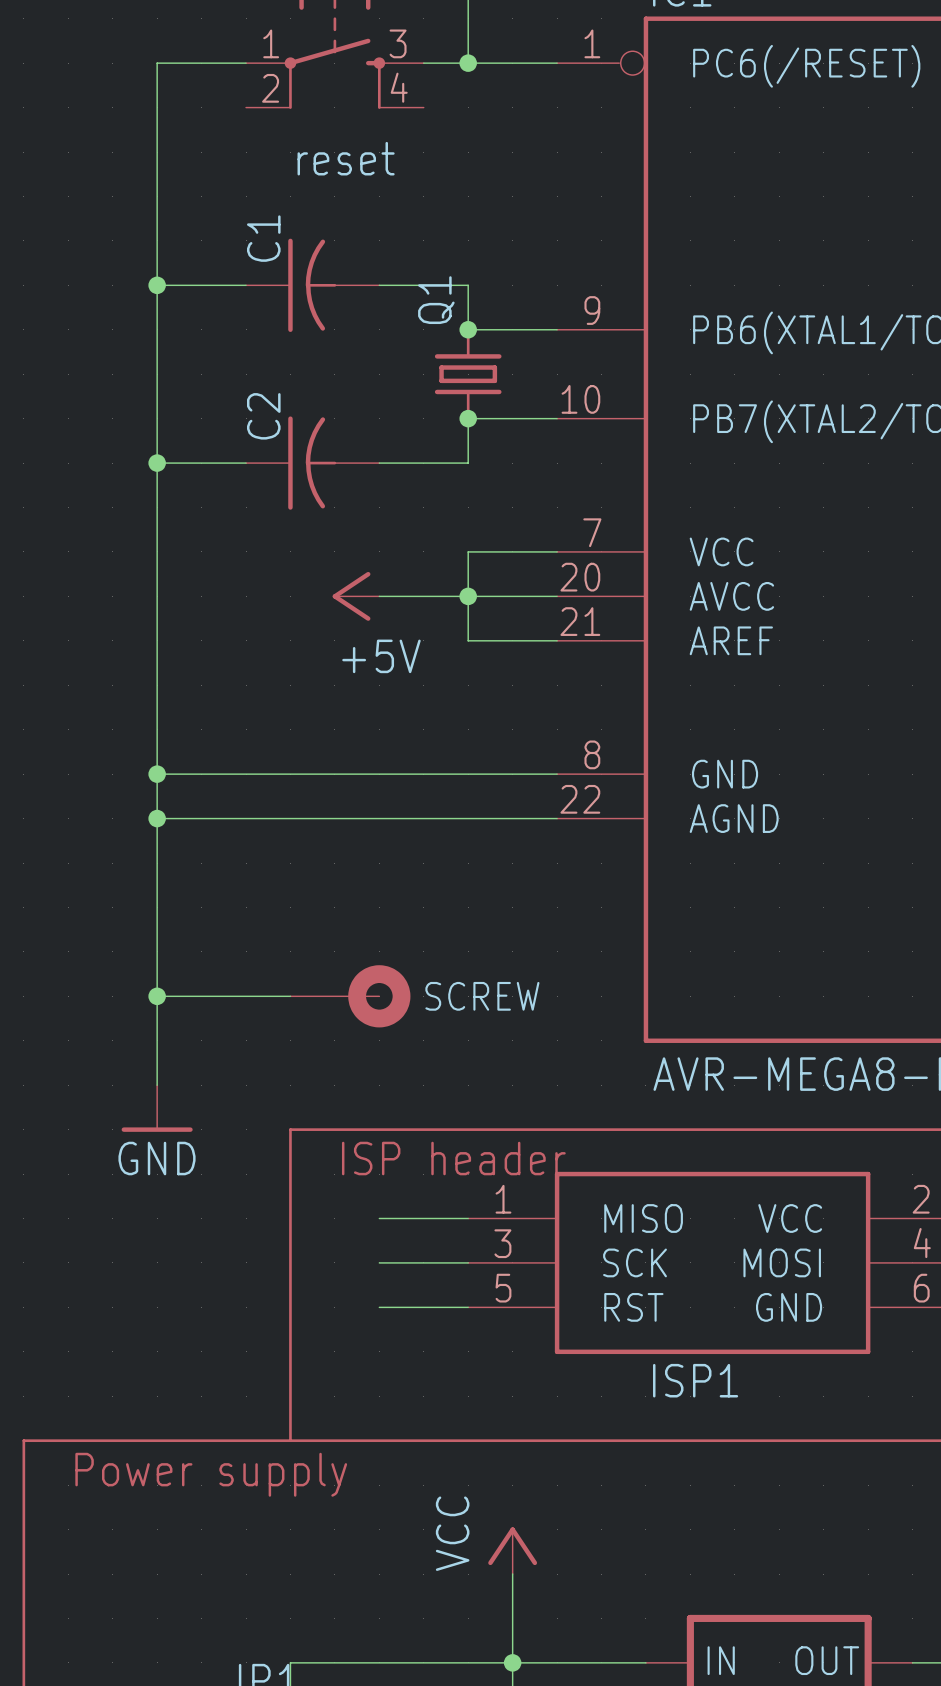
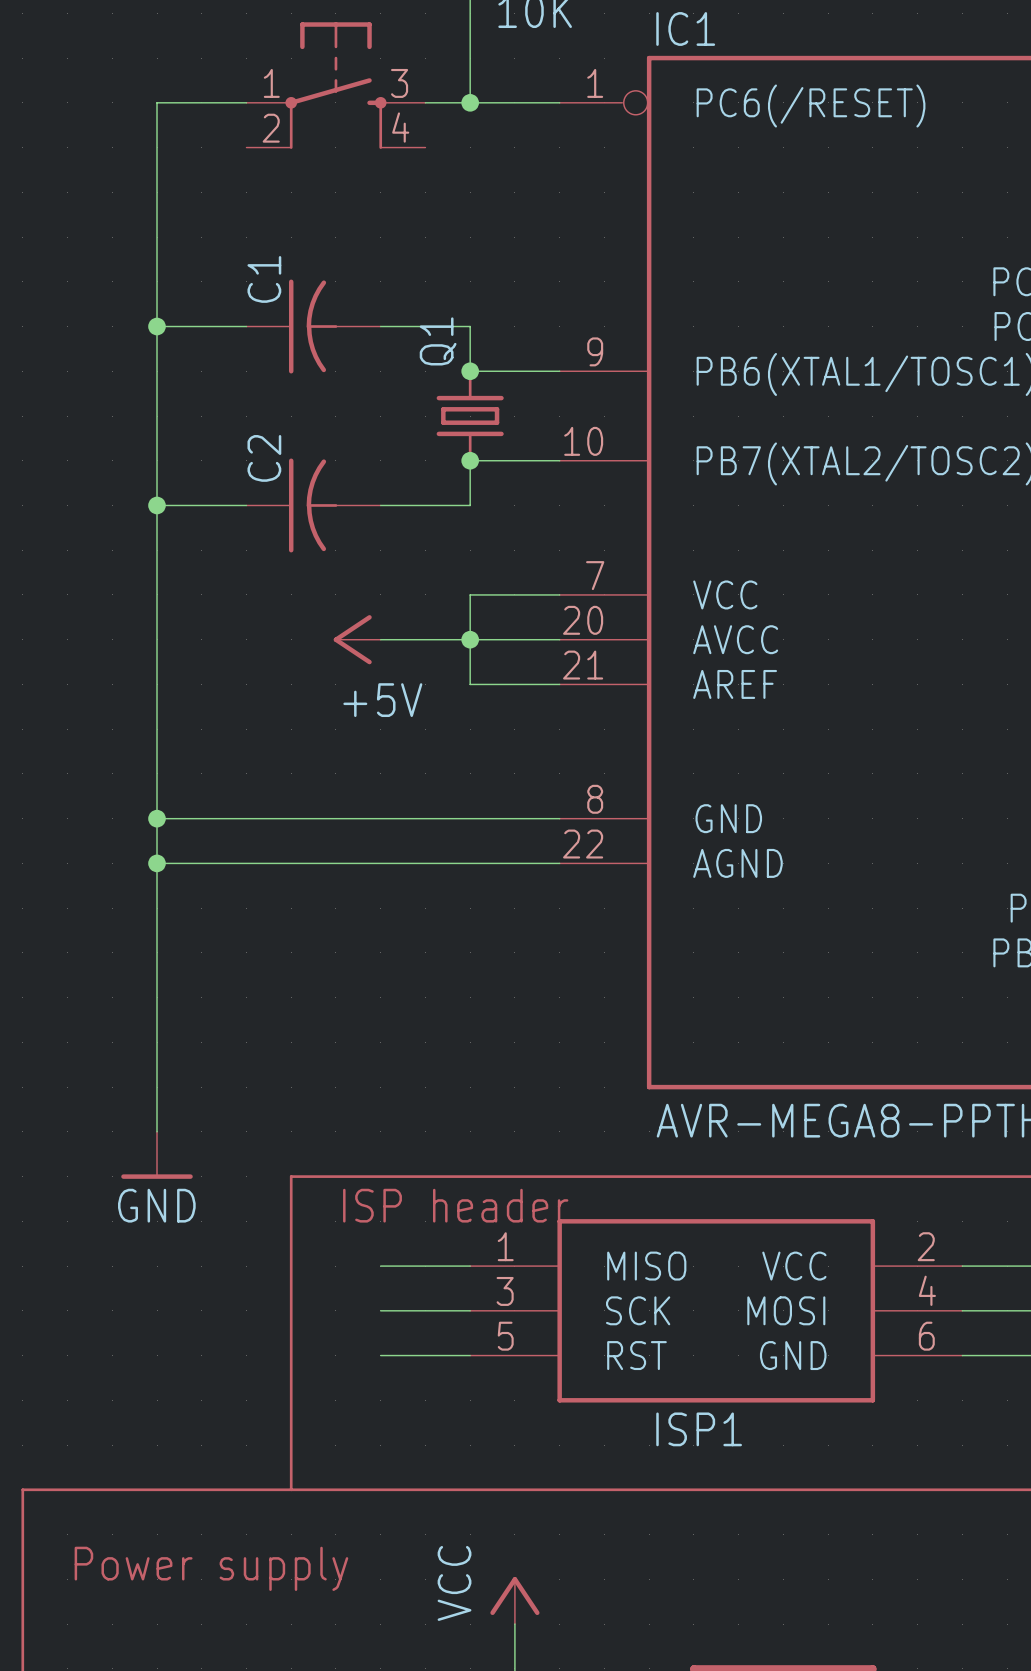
part value: reset (346, 158) -> none
wire: (157, 996) (290, 996) -> none
junction: (157, 996) -> none
part: (350, 996) -> none
text position: Power supply (211, 1474) -> Power supply (211, 1568)

